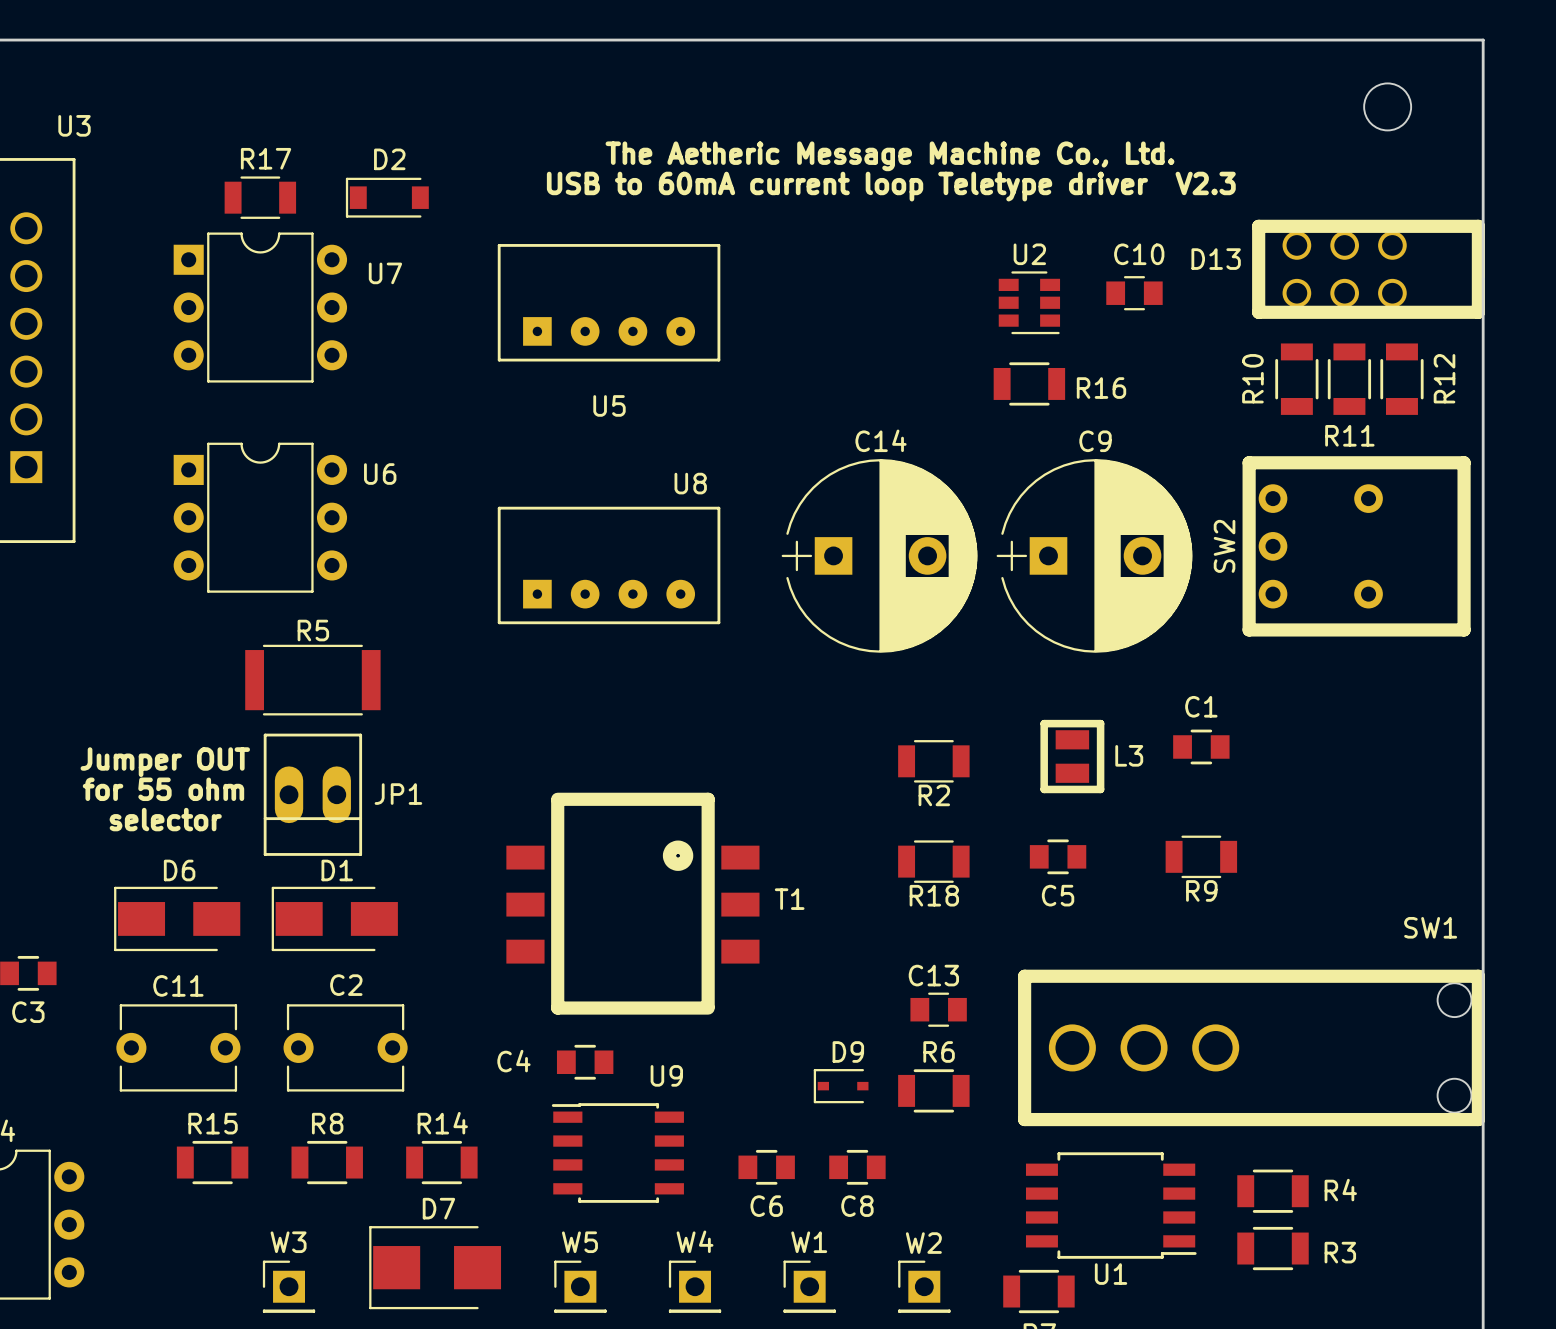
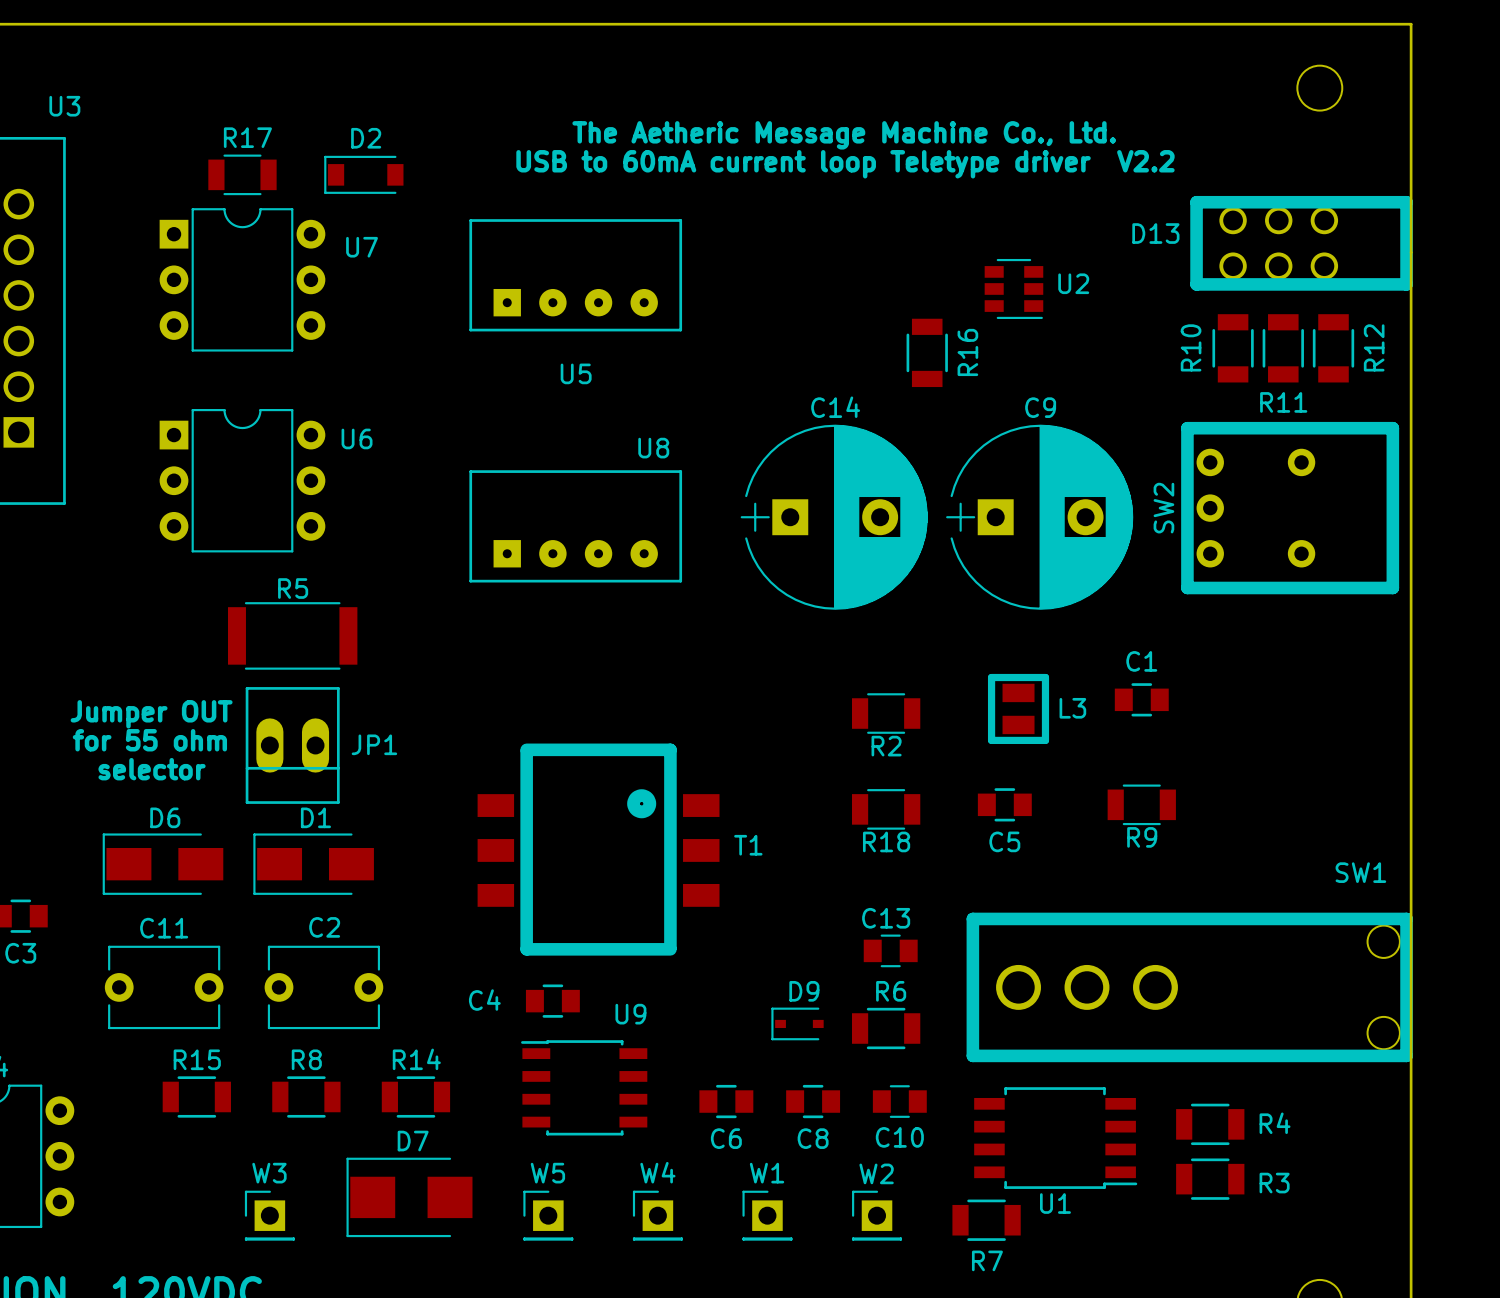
text: USB to 60mA current loop Teletype driver V2.3 (891, 186) -> USB to 60mA current loop Teletype driver V2.2 (845, 164)
U2 name position: U2 (1029, 254) -> U2 (1073, 283)
C10 name position: C10 (1139, 254) -> C10 (899, 1137)
C10 position: (1134, 293) -> (899, 1101)
U2 position: (1029, 302) -> (1013, 288)
R16 rotation: 0° (1029, 383) -> 90° clockwise (927, 352)
R16 position: (1029, 383) -> (927, 352)

